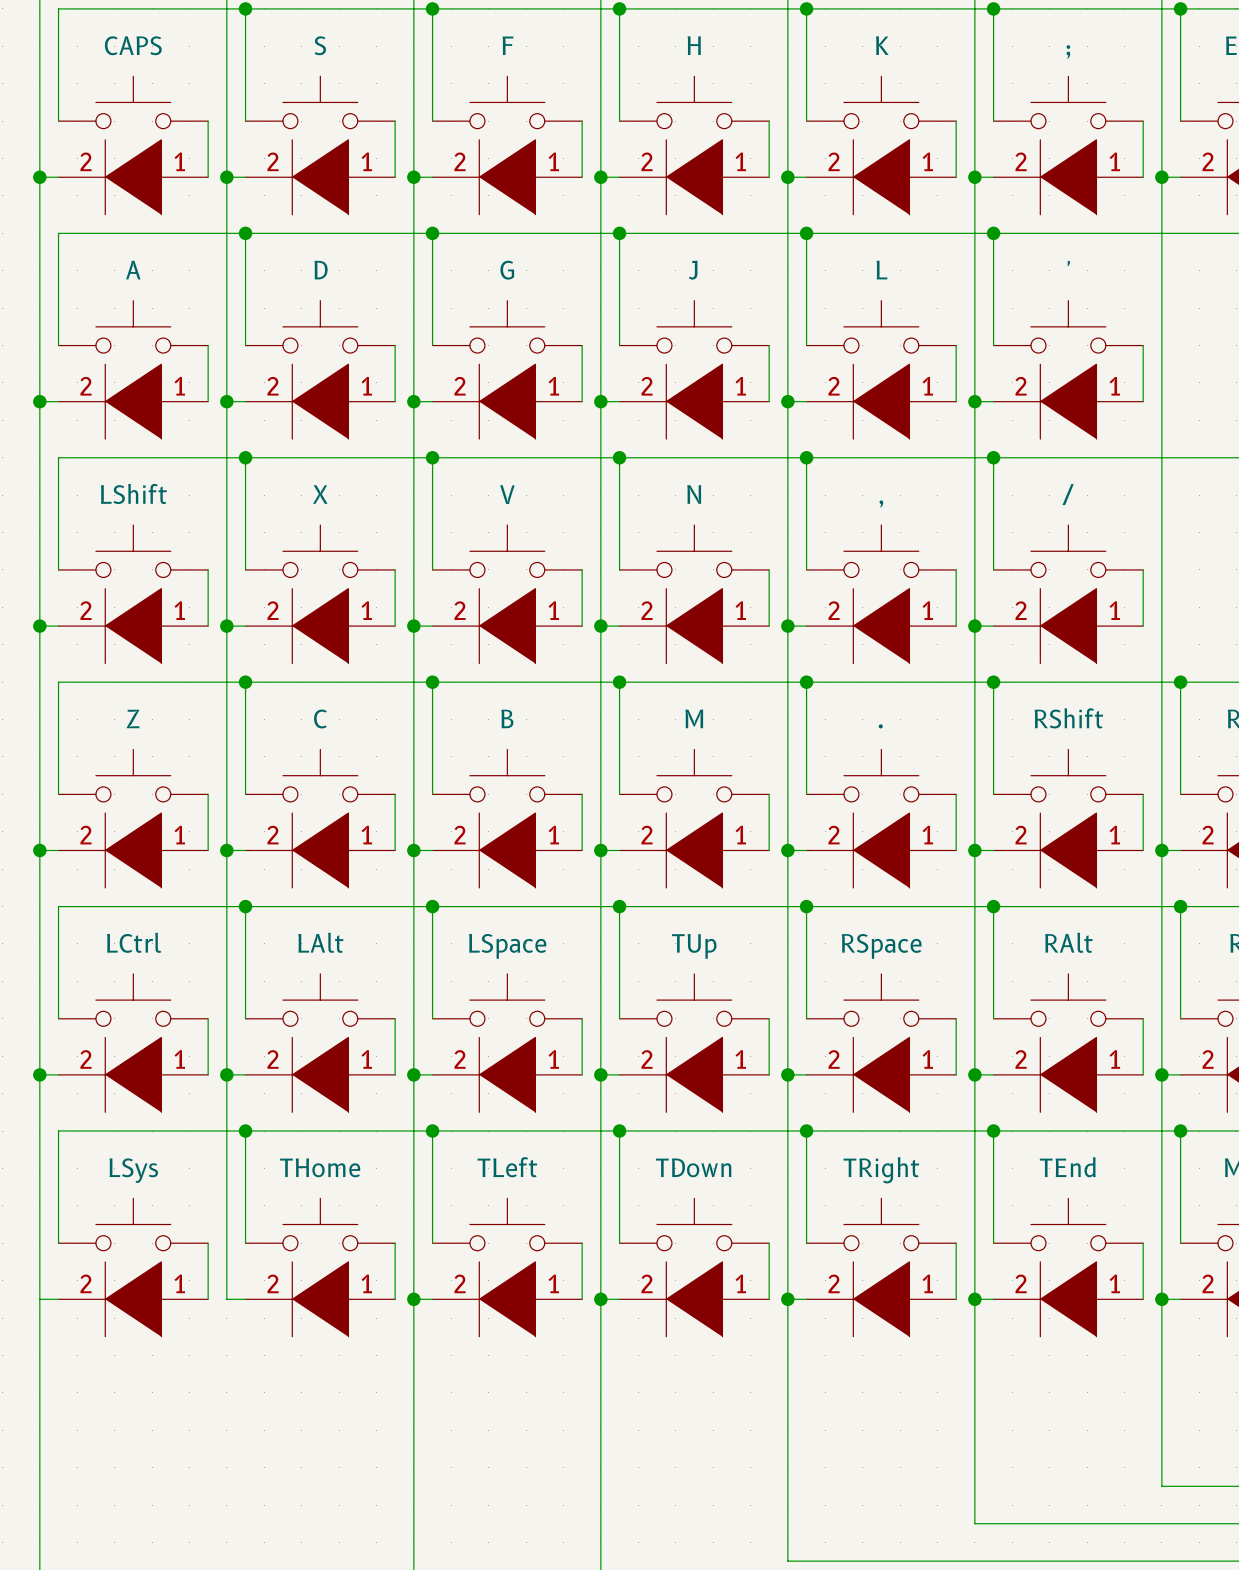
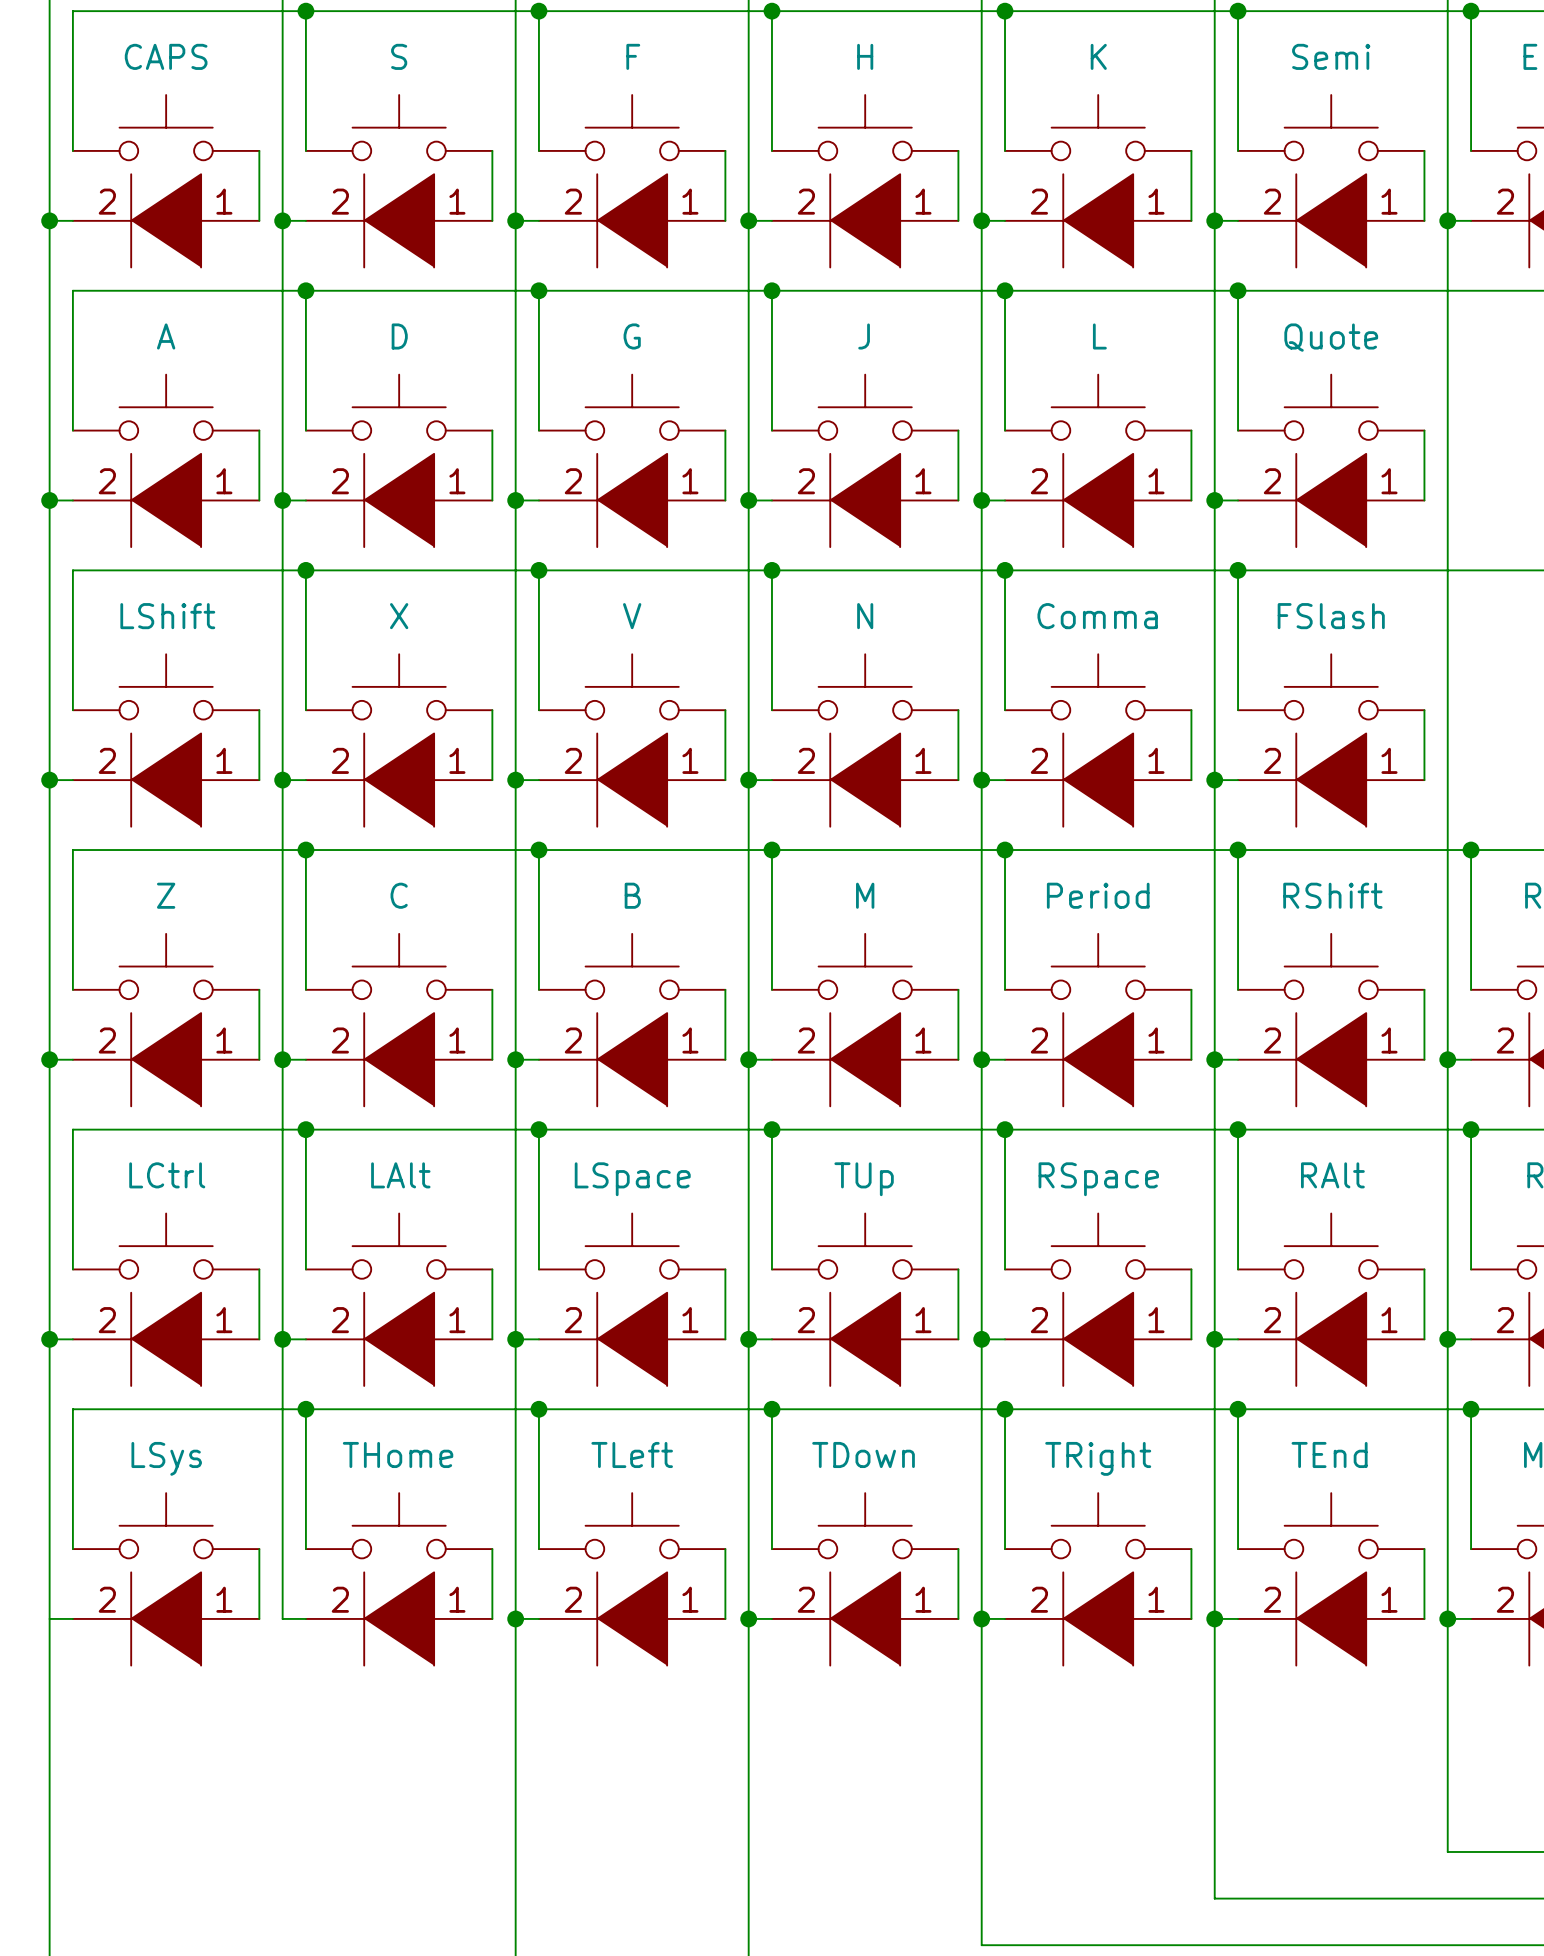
part value: ; (1068, 51) -> Semi (1331, 56)
part value: ' (1068, 263) -> Quote (1331, 337)
part value: / (1068, 494) -> FSlash (1331, 616)
part value: , (881, 503) -> Comma (1097, 616)
part value: . (880, 726) -> Period (1098, 895)

